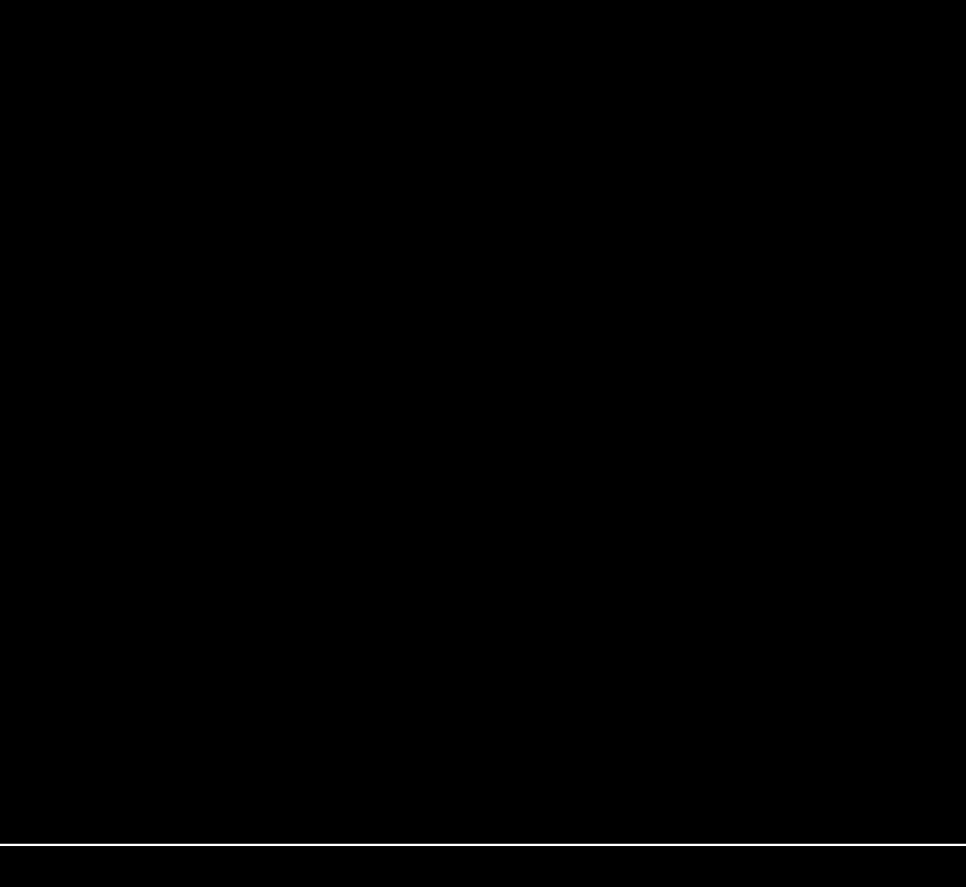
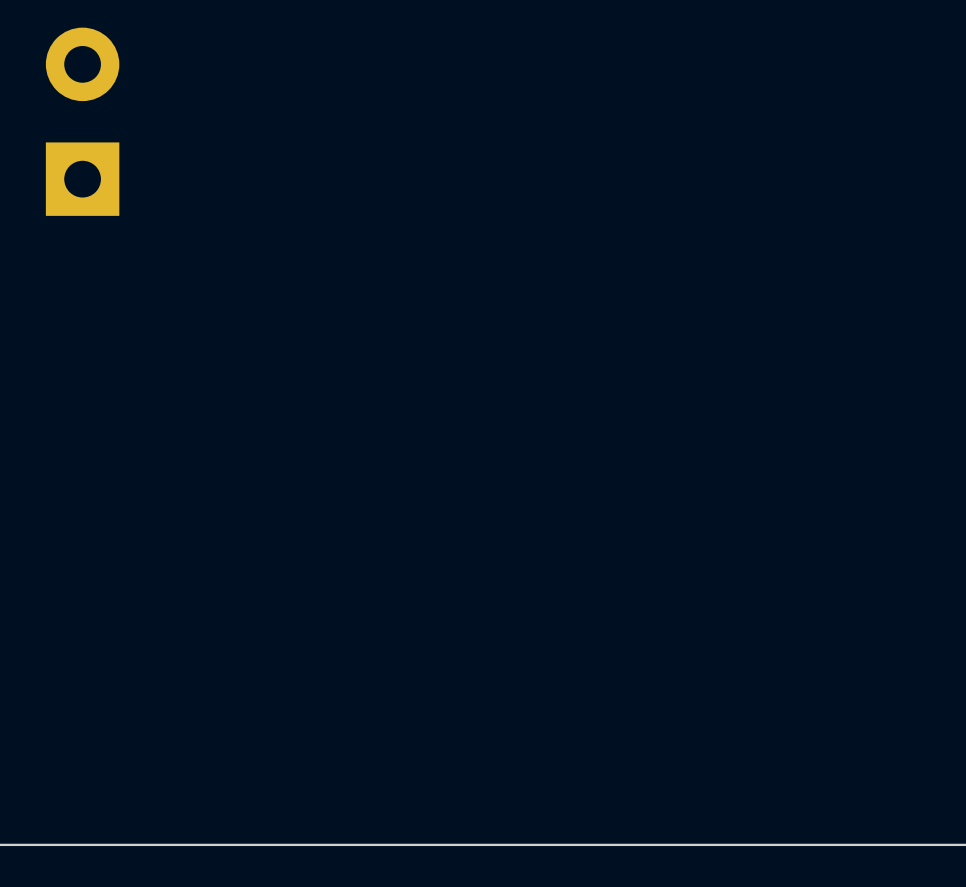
part: none -> (82, 121)

